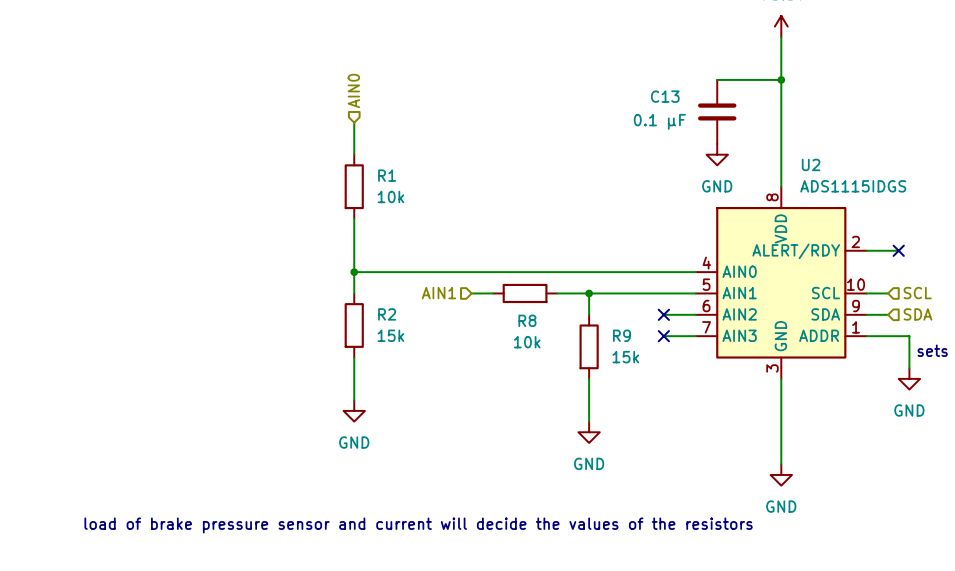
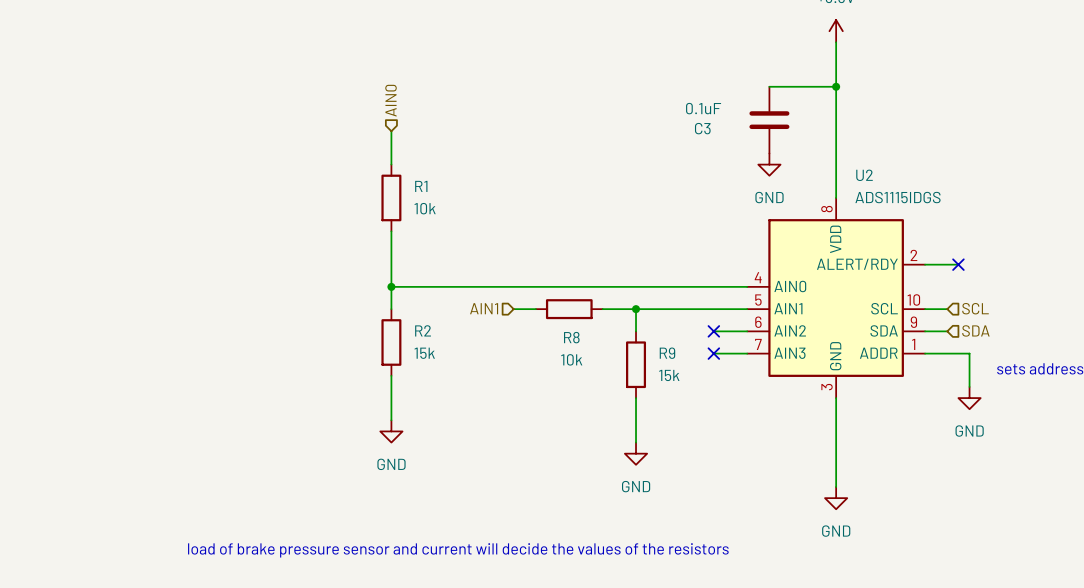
C13 name: C13 (665, 96) -> C3 (702, 128)
C13 value: 0.1 µF (659, 121) -> 0.1uF (703, 108)

